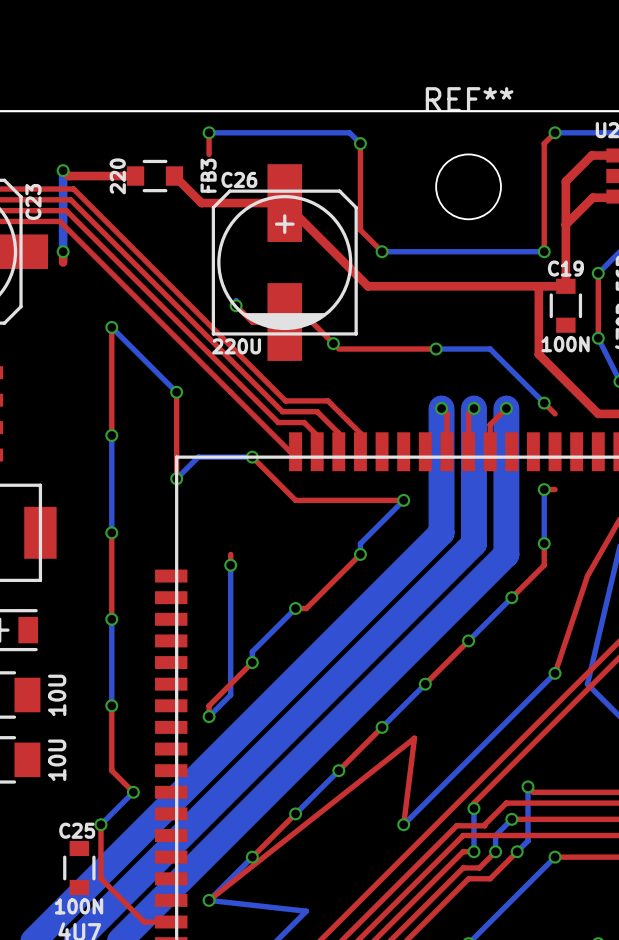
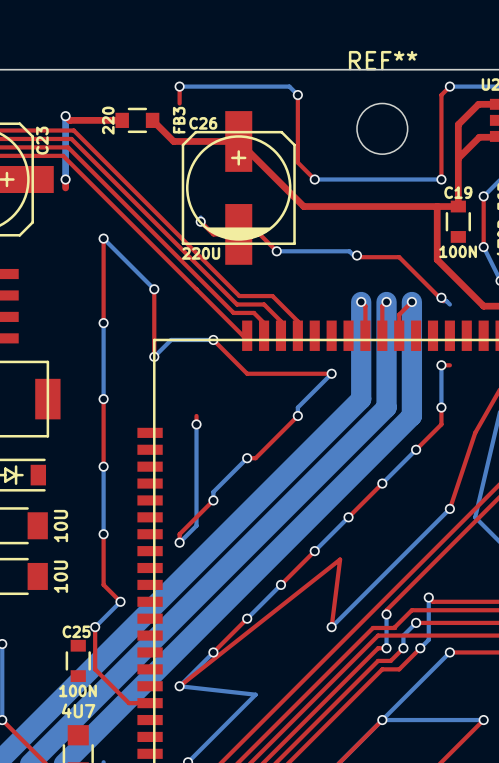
bottom track: none -> (276, 251) (349, 251) (355, 257)
top track: (338, 349) (436, 349) -> none
bottom track: (436, 349) (490, 349) (544, 403) -> none
top track: none -> (355, 257) (399, 257) (443, 301)
top track: (544, 403) (555, 413) -> none
bottom track: none -> (443, 301) (446, 301) (449, 304)

